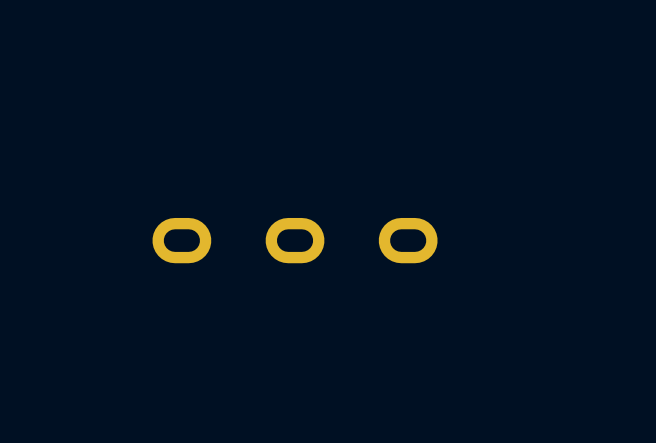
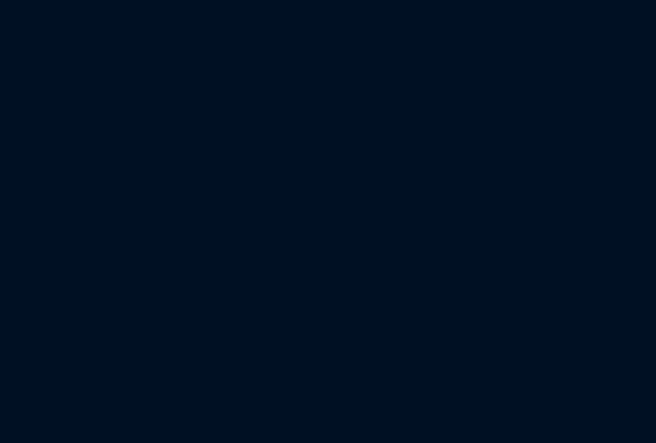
part: (295, 240) -> none

